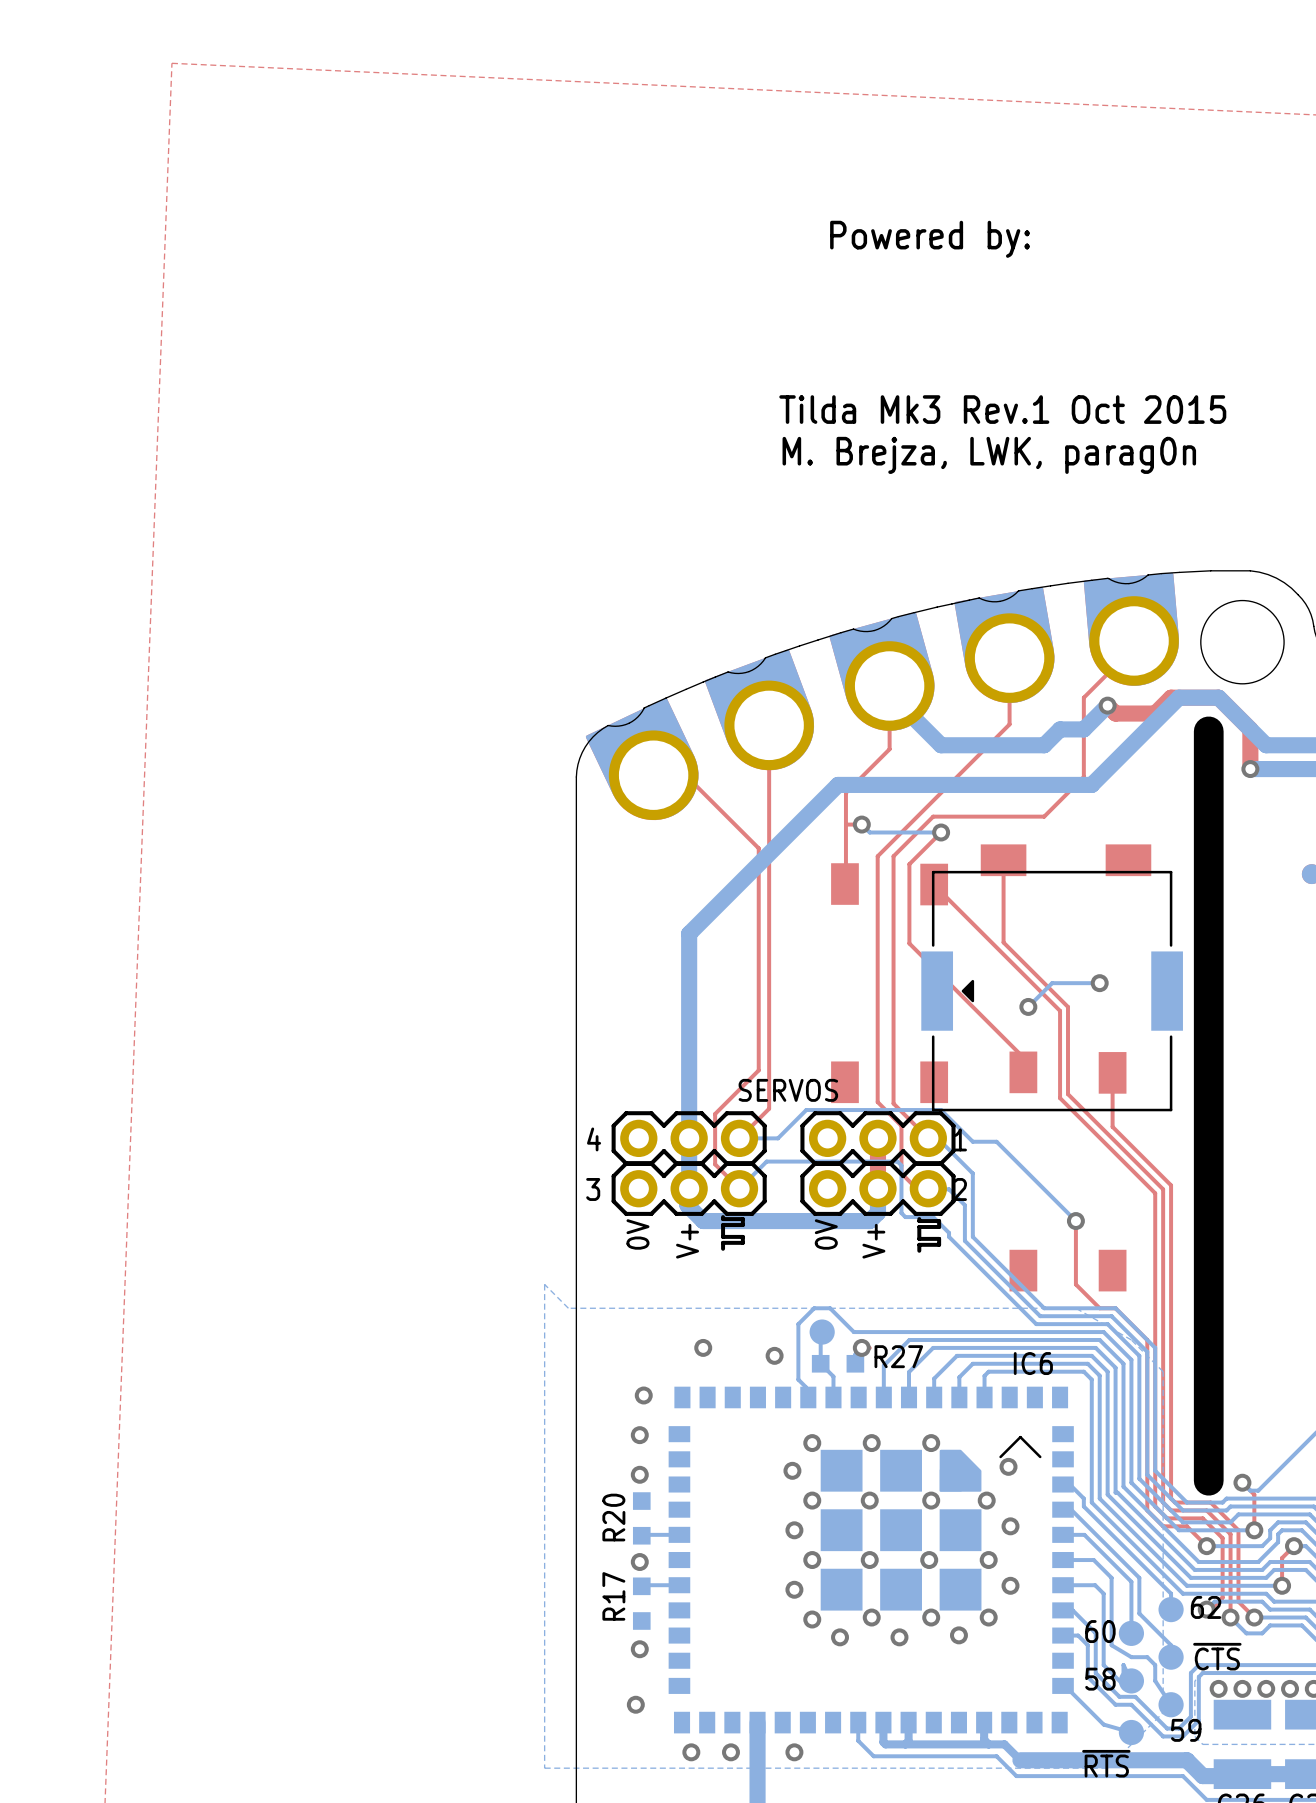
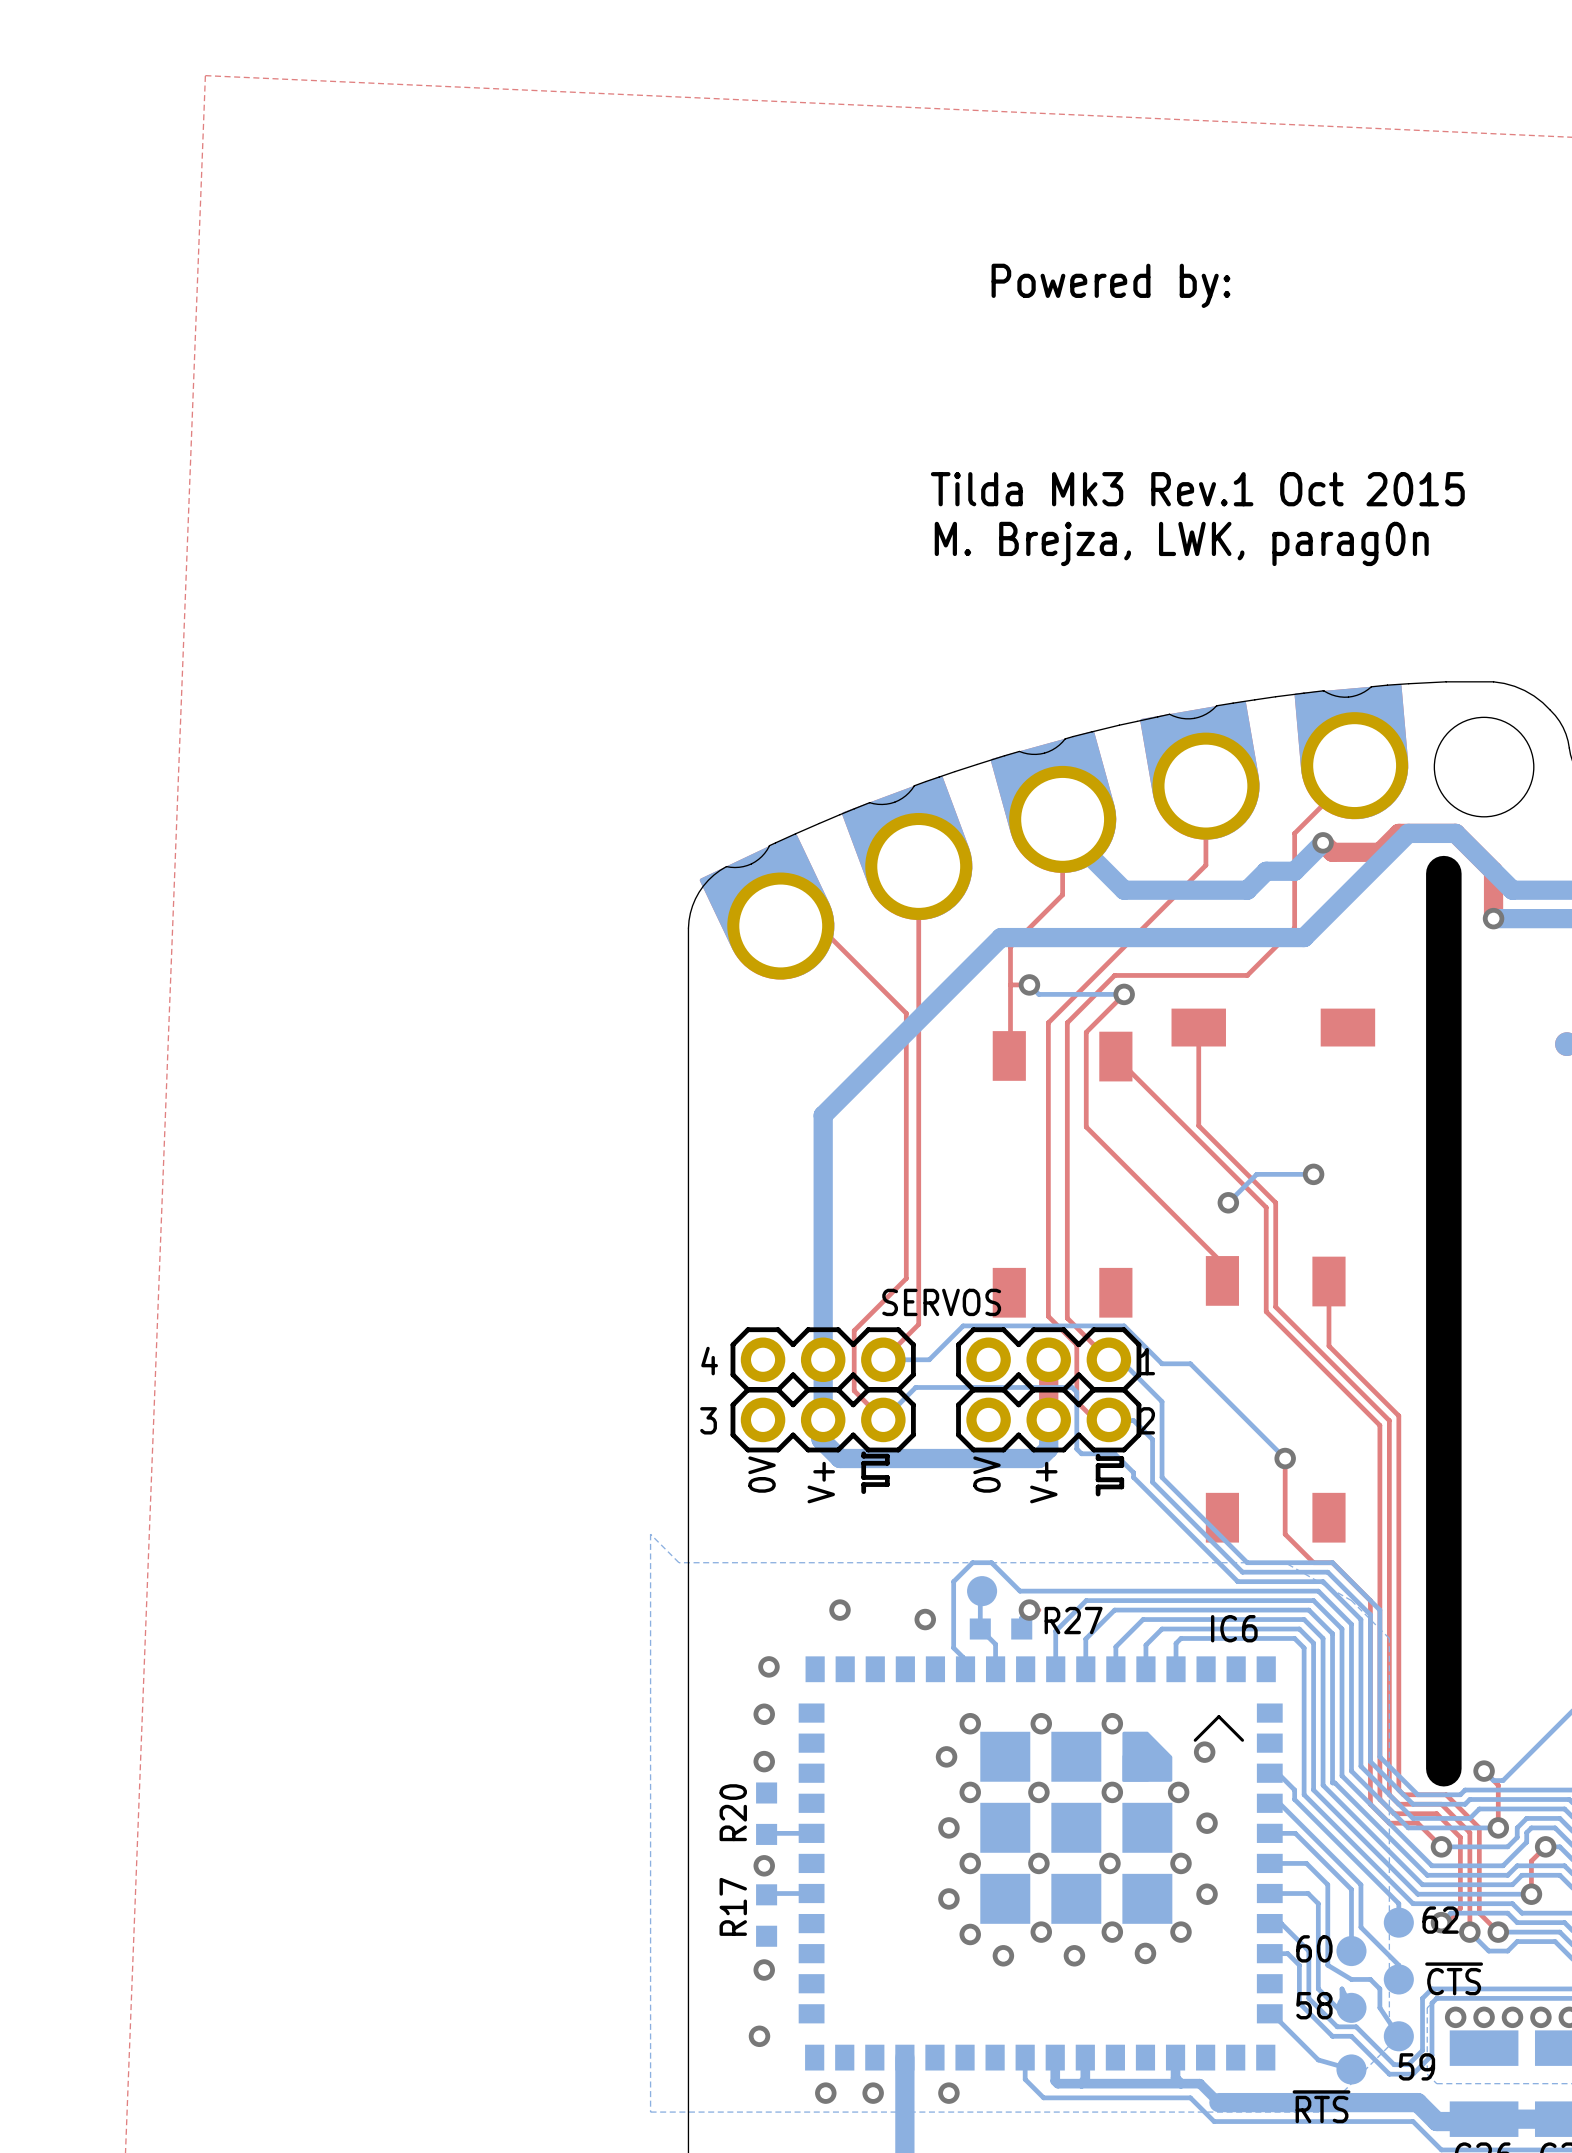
part: (1052, 991) -> none

